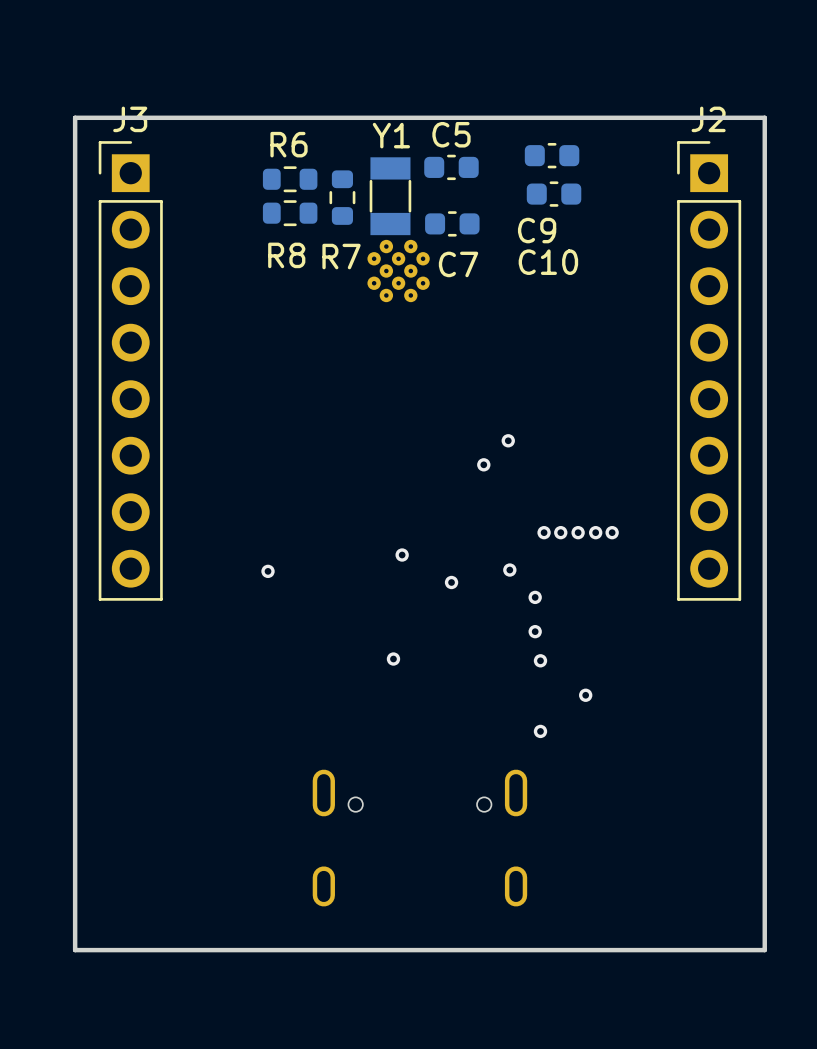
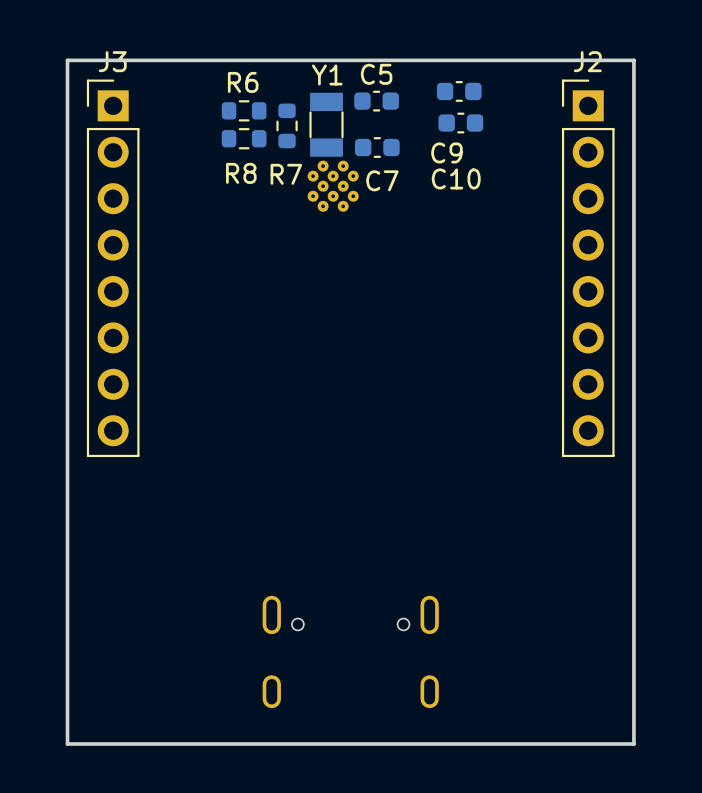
via: (508, 440) -> none
via: (483, 464) -> none
via: (544, 532) -> none
via: (560, 532) -> none
via: (578, 532) -> none
via: (595, 532) -> none
via: (612, 532) -> none
via: (402, 555) -> none
via: (509, 570) -> none
via: (268, 571) -> none
via: (451, 582) -> none
via: (535, 597) -> none
via: (535, 631) -> none
via: (393, 659) -> none
via: (540, 660) -> none
via: (585, 695) -> none
via: (540, 731) -> none

